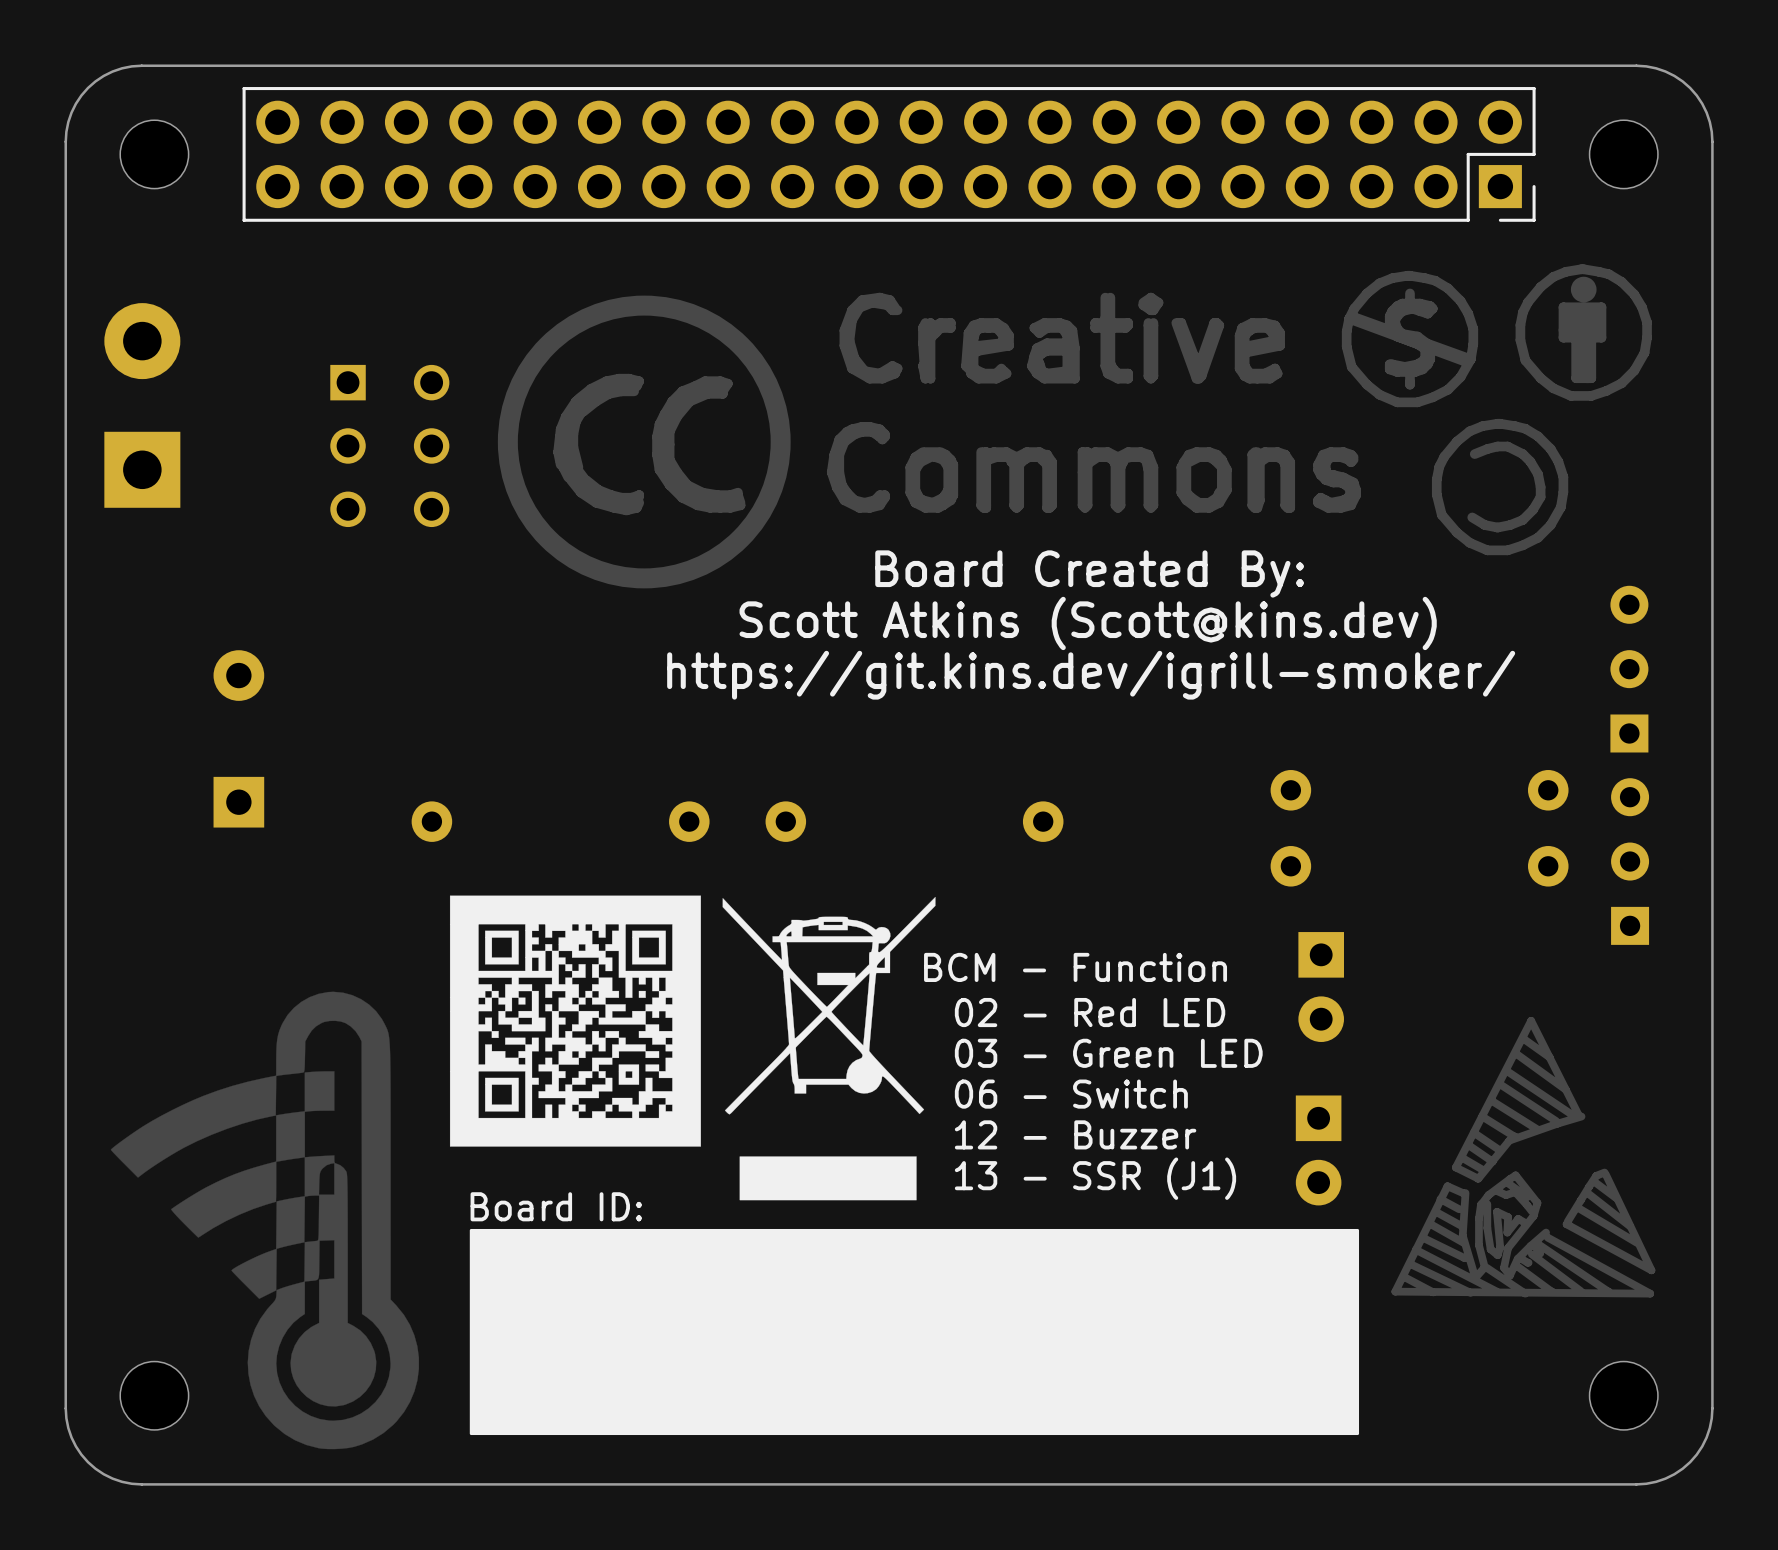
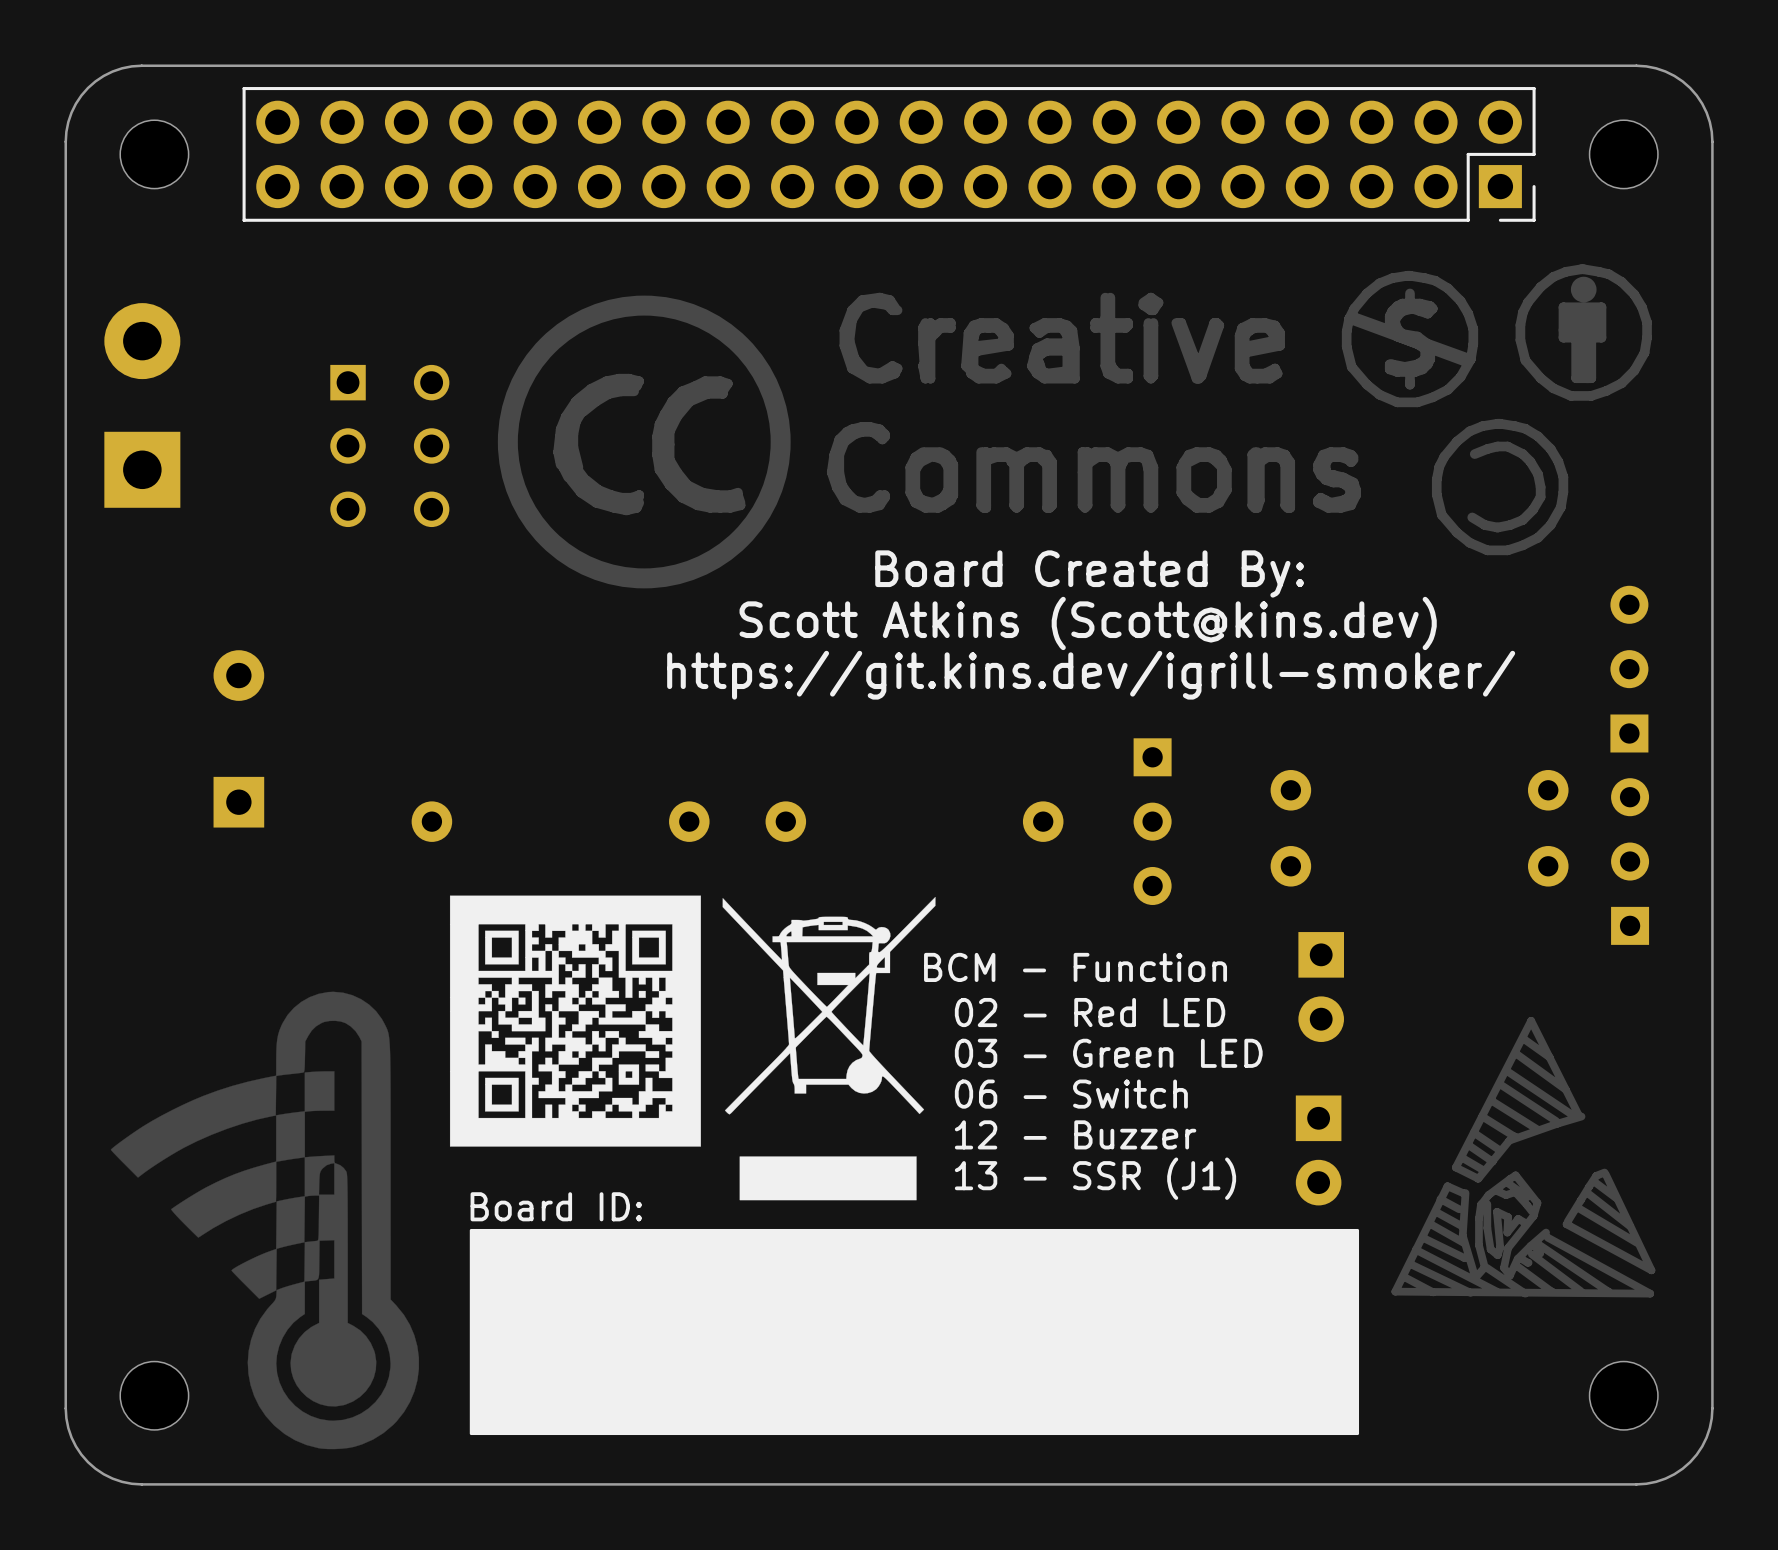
part: none -> (1152, 821)

